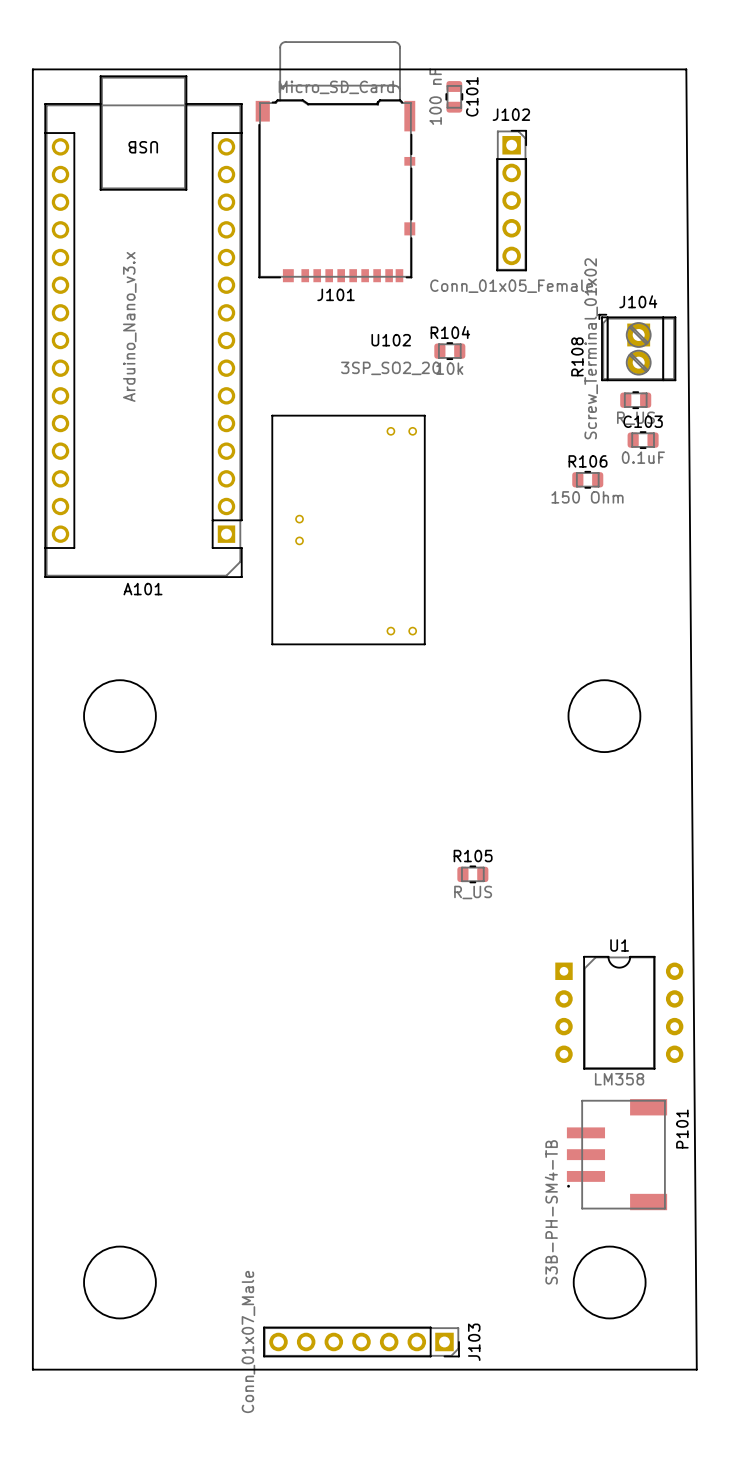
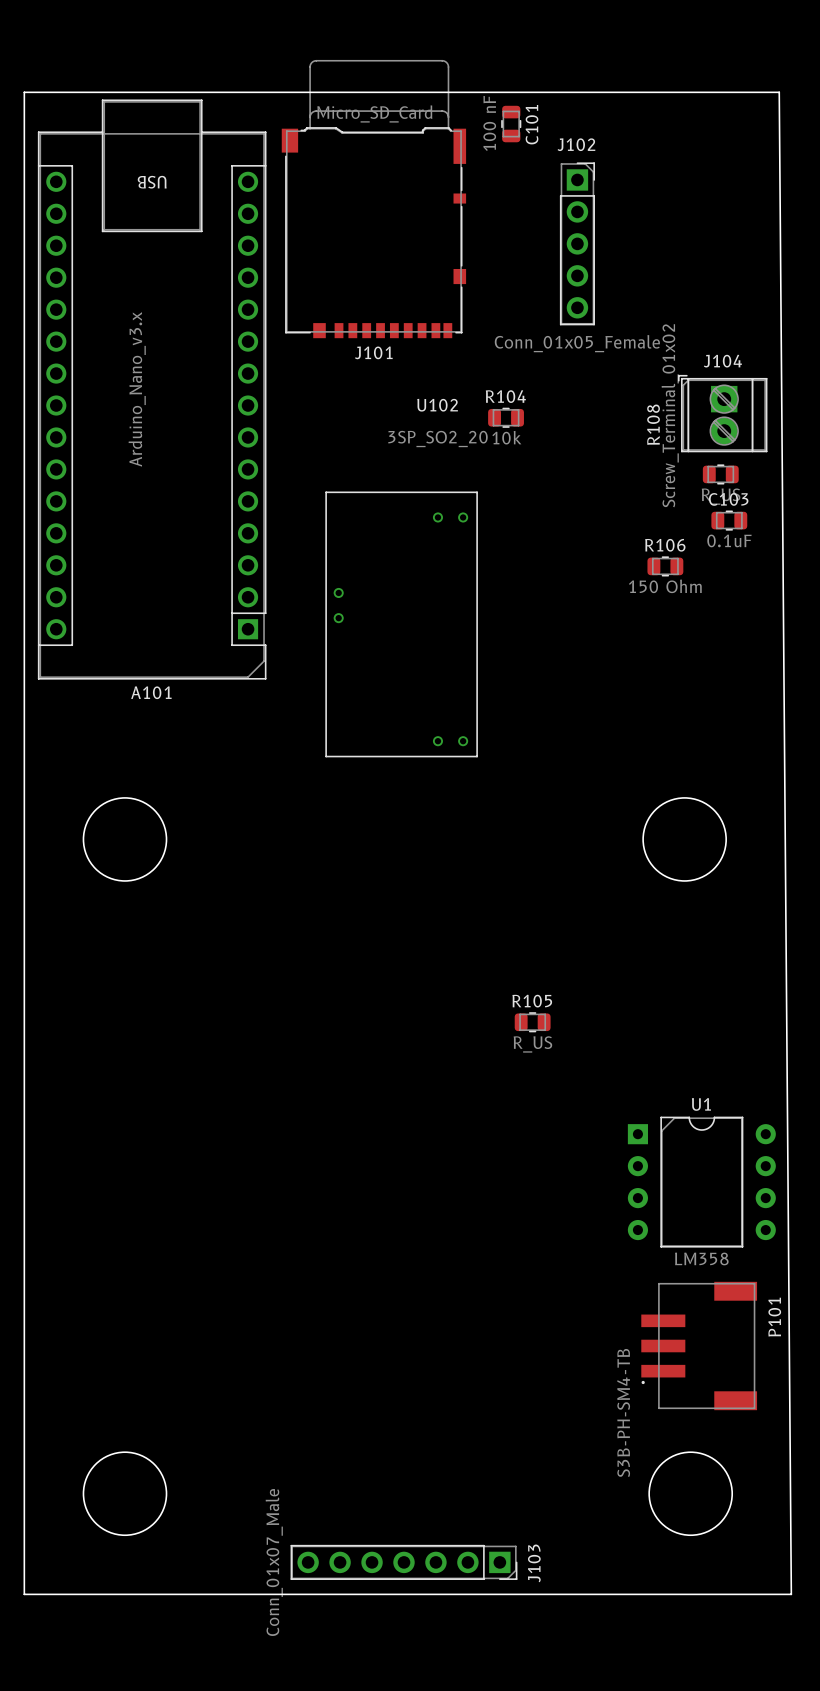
U102 footprint: [271, 414, 426, 646] -> [325, 491, 478, 758]

